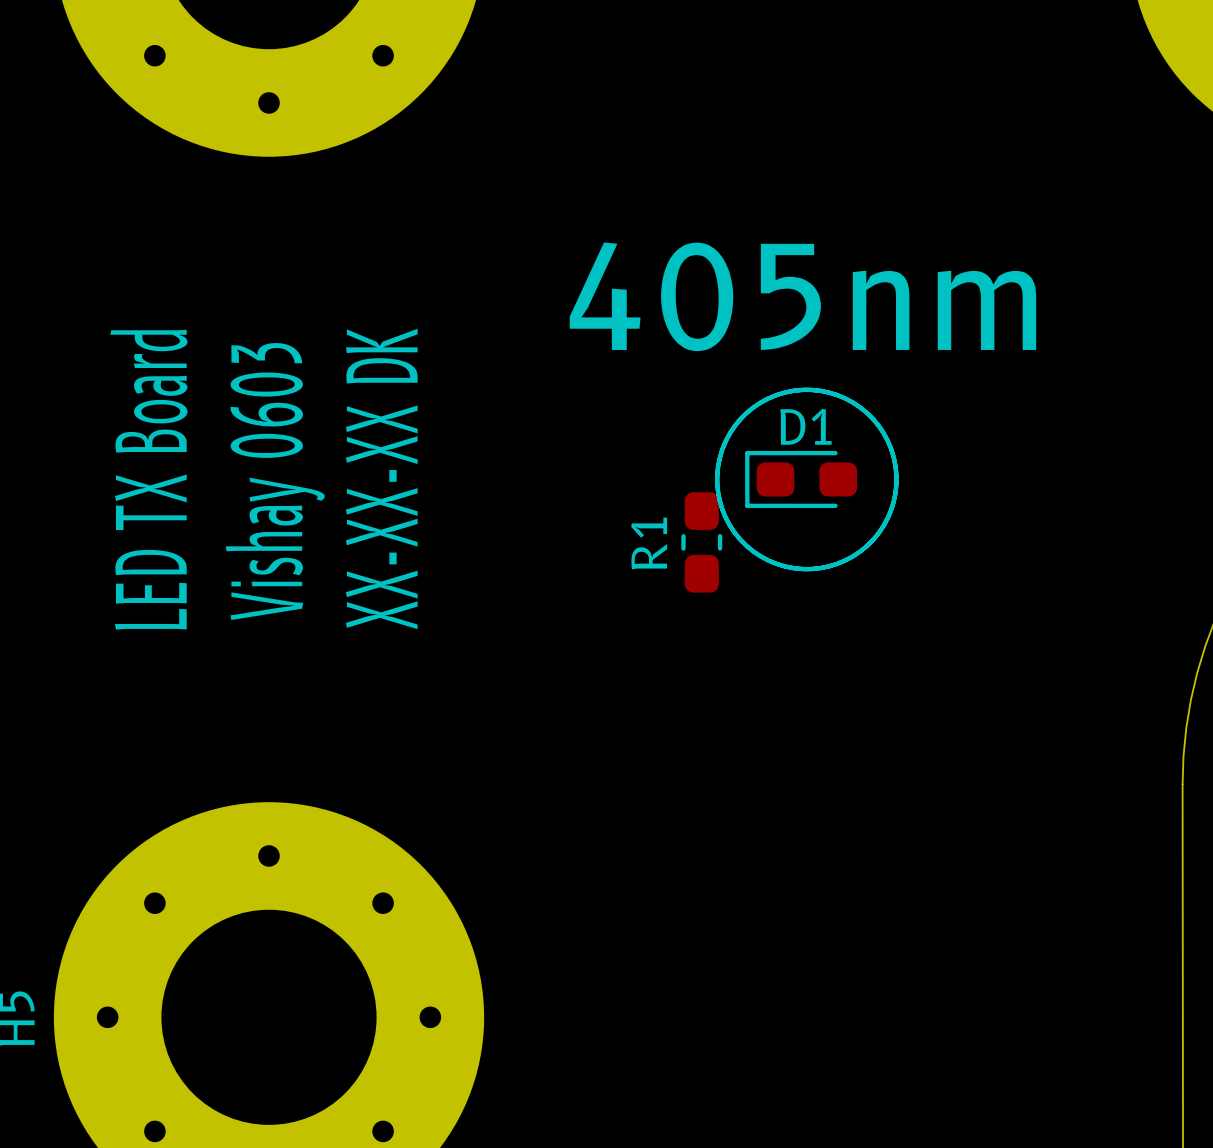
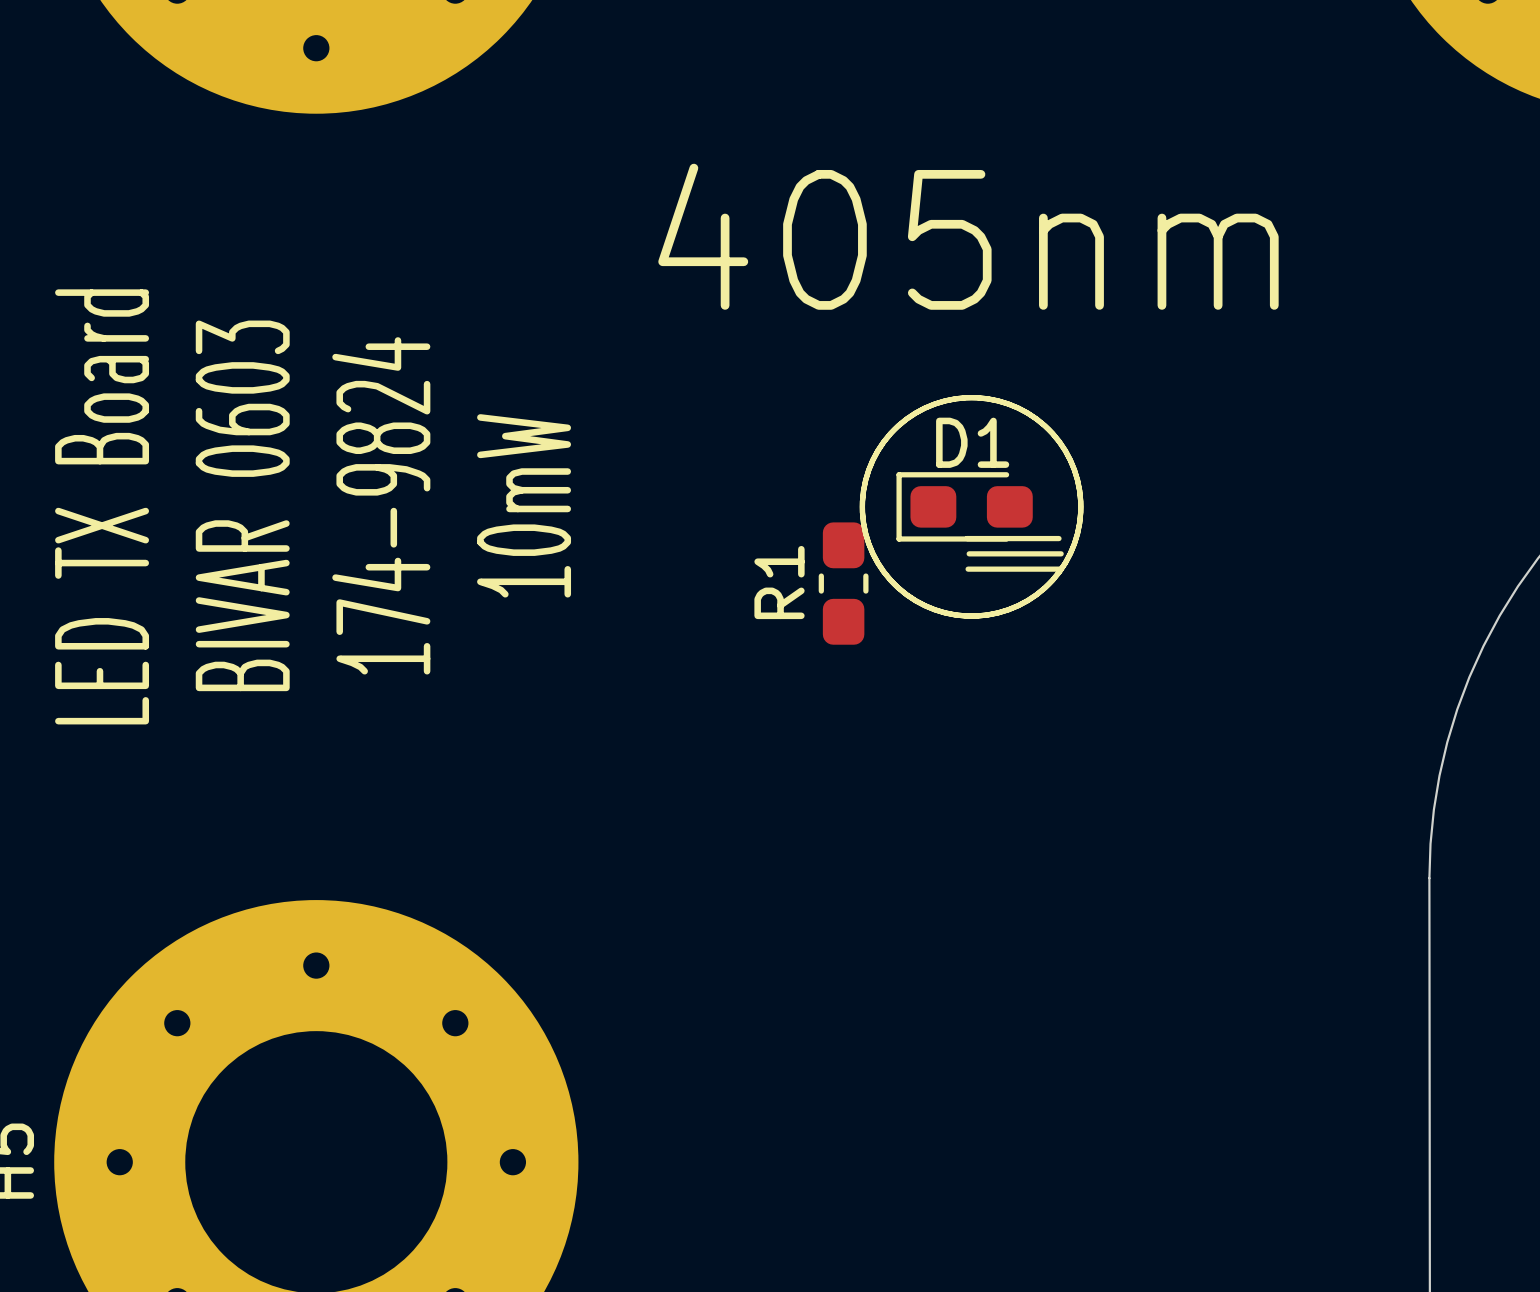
text position: 405nm (802, 296) -> 405nm (968, 236)
text: XX-XX-XX DK (381, 478) -> none
text: none -> 10mW (524, 505)
text position: LED TX Board (148, 479) -> LED TX Board (102, 506)
text: none -> 174-9824 (381, 505)
text: none -> BIVAR 0603 (242, 505)
text: Vishay 0603 (275, 481) -> none
line: none -> (967, 538) (1058, 538)
line: none -> (969, 553) (1061, 553)
line: none -> (968, 569) (1060, 569)

